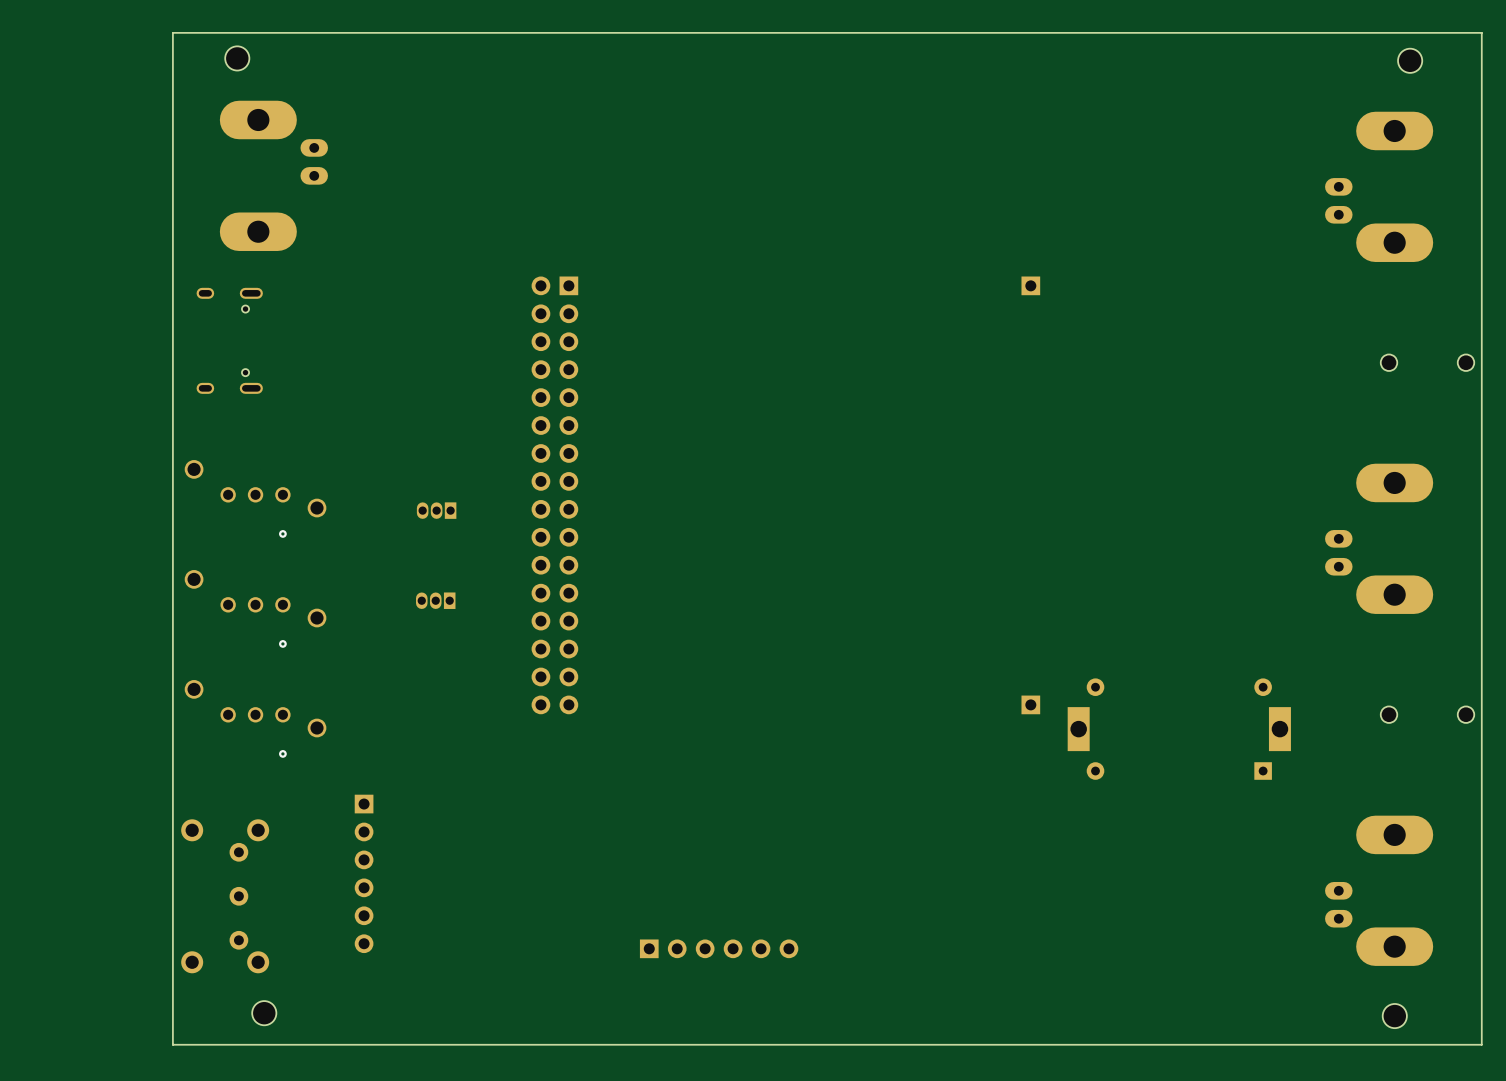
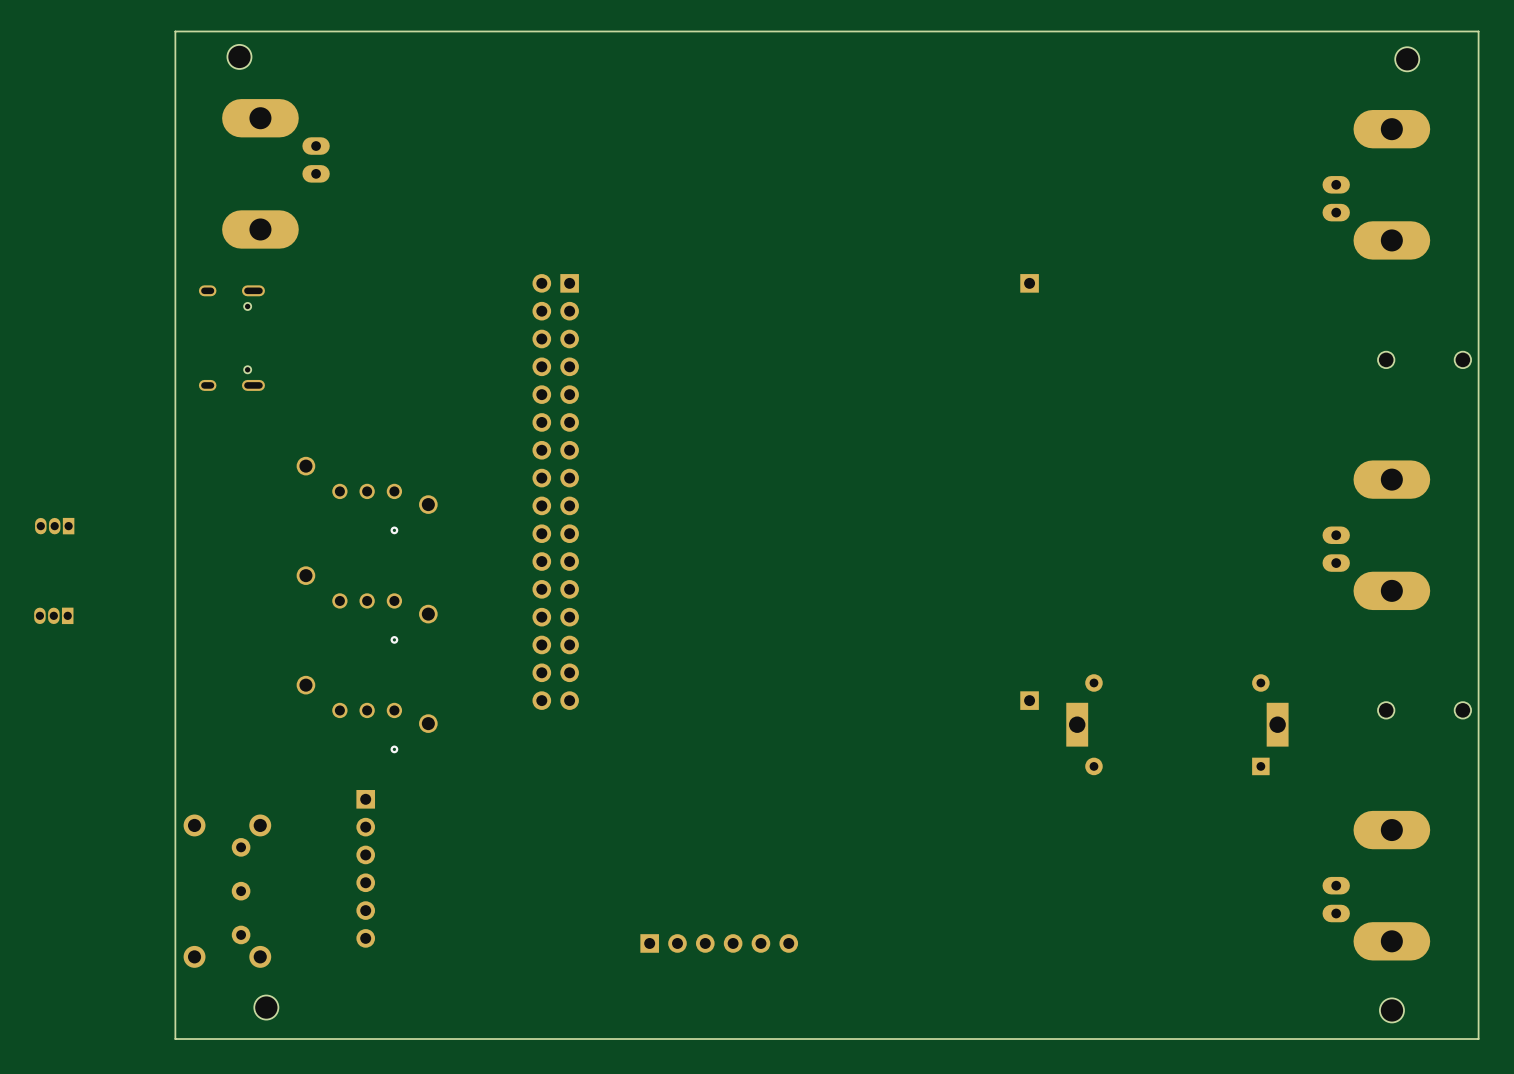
part: (255, 498) -> none
part: none -> (367, 495)
part: (436, 510) -> none
part: none -> (54, 526)
part: (435, 600) -> none
part: (255, 608) -> none
part: none -> (367, 605)
part: none -> (53, 615)
part: (255, 718) -> none
part: none -> (367, 714)

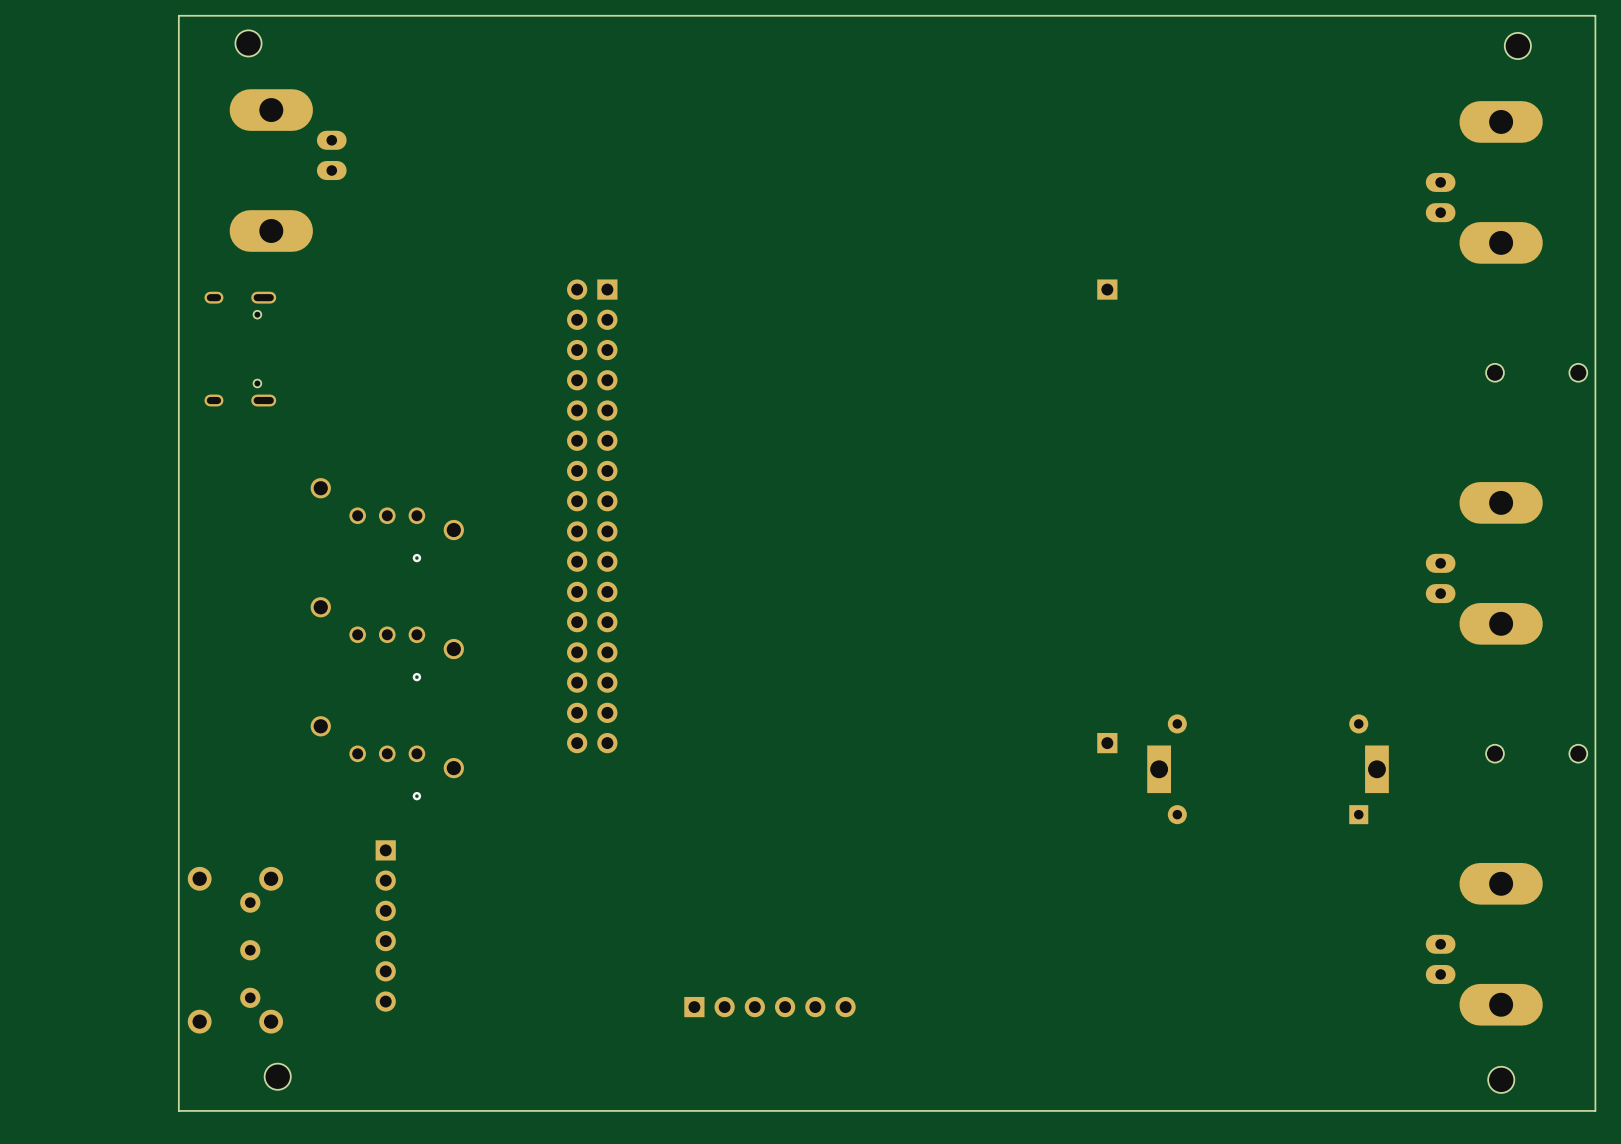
part: (54, 526) -> none
part: (53, 615) -> none

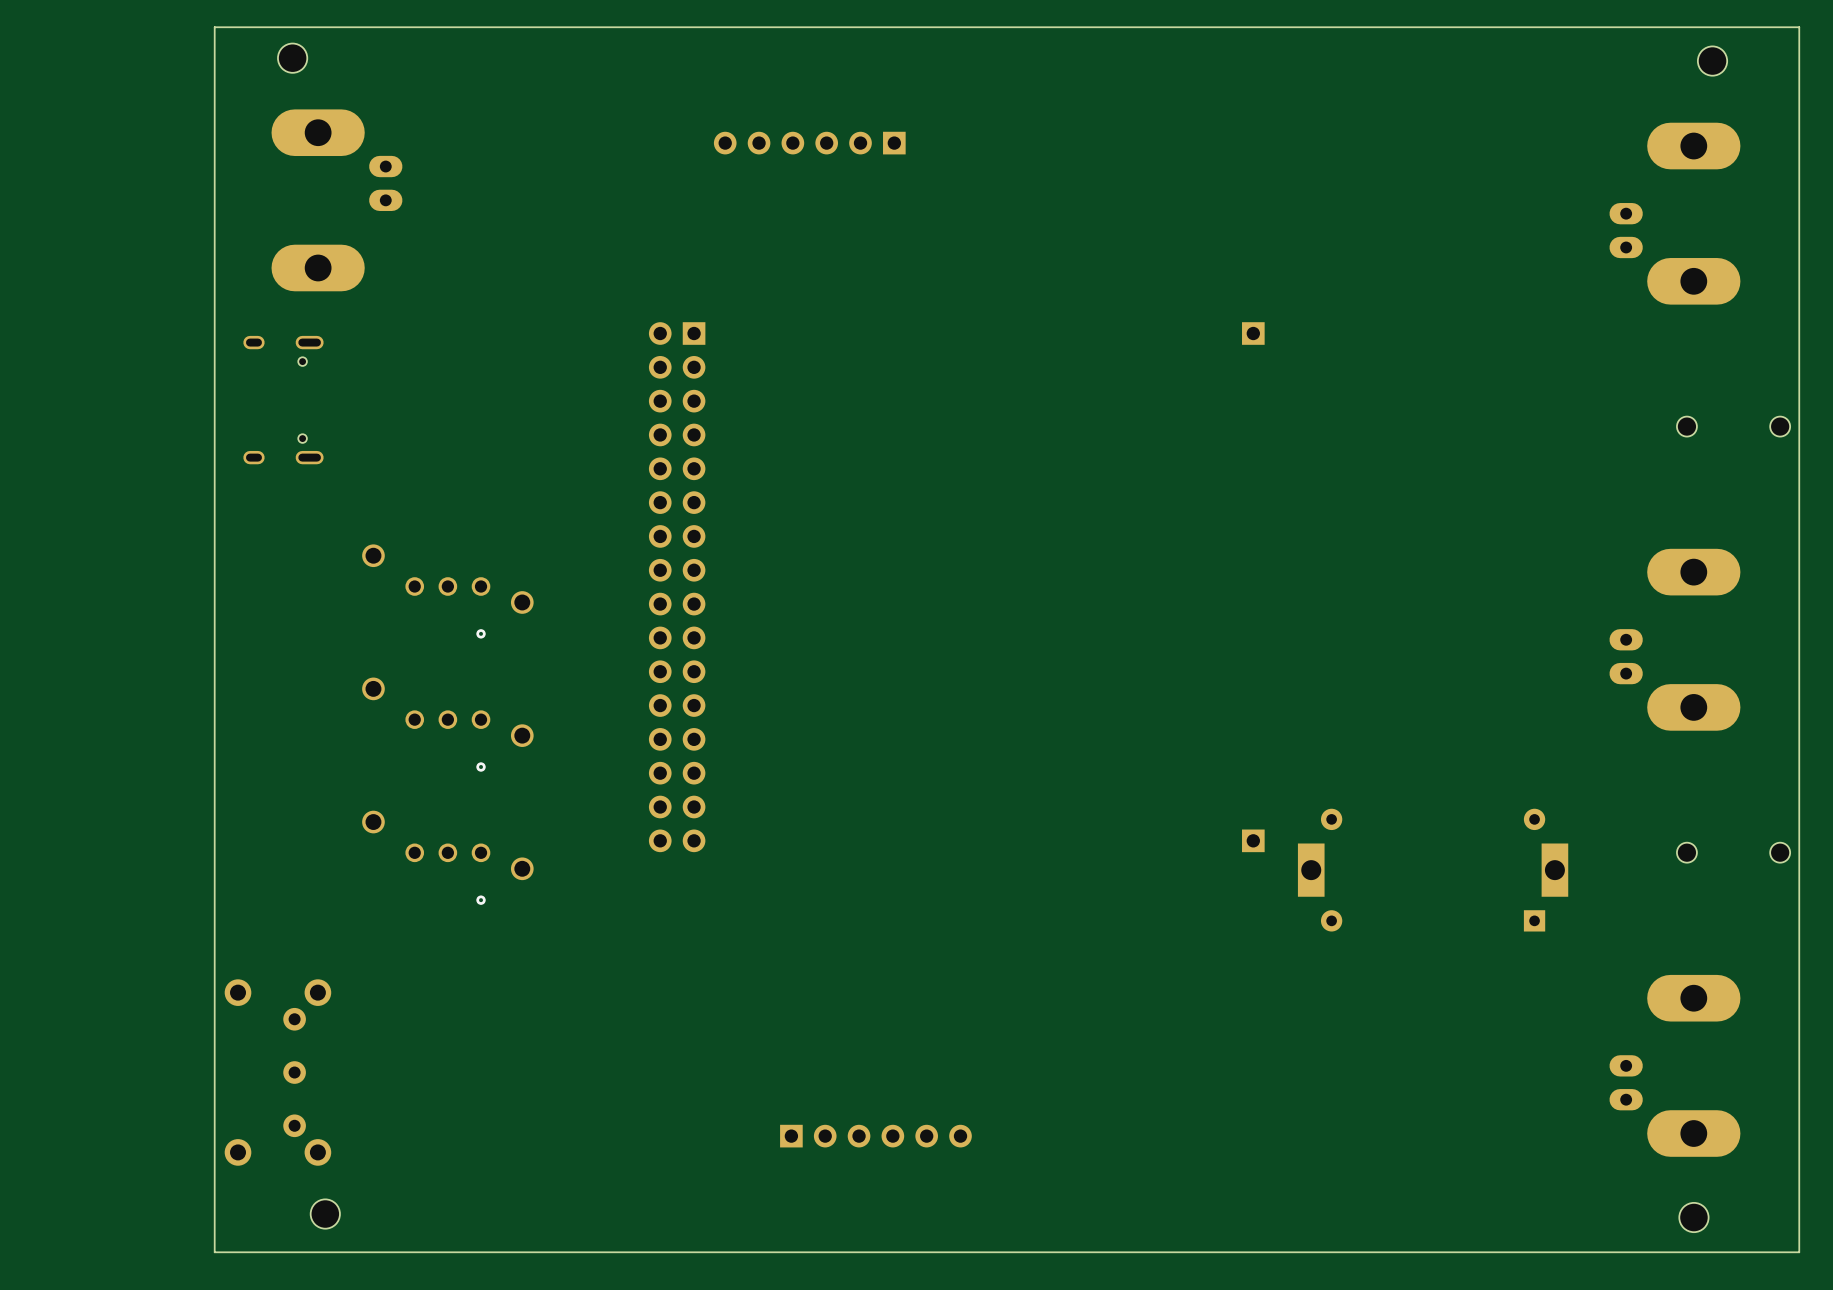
part: none -> (809, 143)
part: (385, 925) -> none

